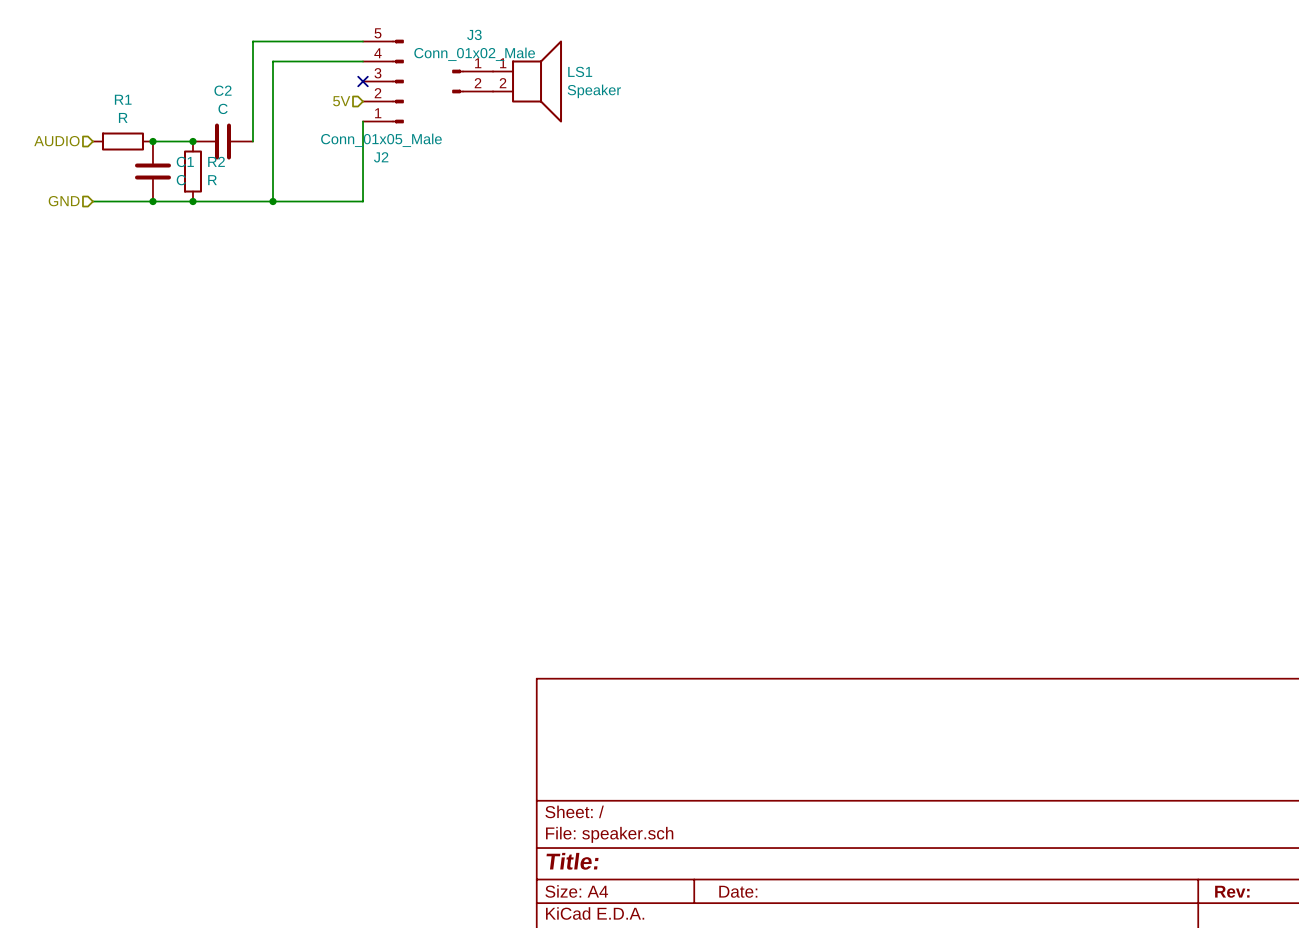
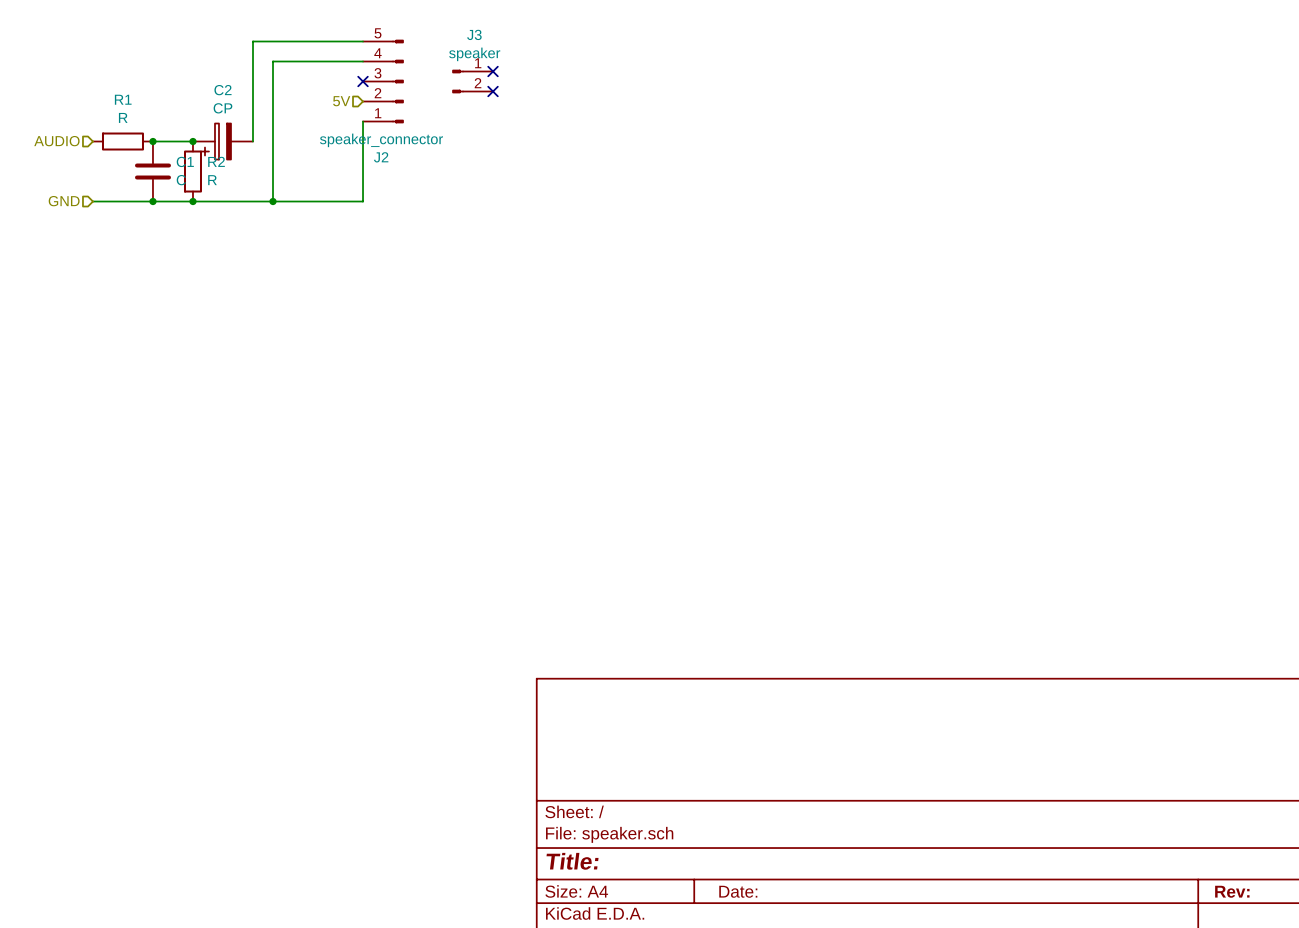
J3 value: Conn_01x02_Male (474, 54) -> speaker (474, 54)
no-connect mark: none -> (493, 71)
LS1: Speaker (527, 81) -> none
no-connect mark: none -> (493, 91)
C2 value: C (223, 108) -> CP (222, 108)
C2 symbol: [192, 123, 253, 160] -> [192, 123, 253, 160]
J2 value: Conn_01x05_Male (381, 140) -> speaker_connector (381, 140)

